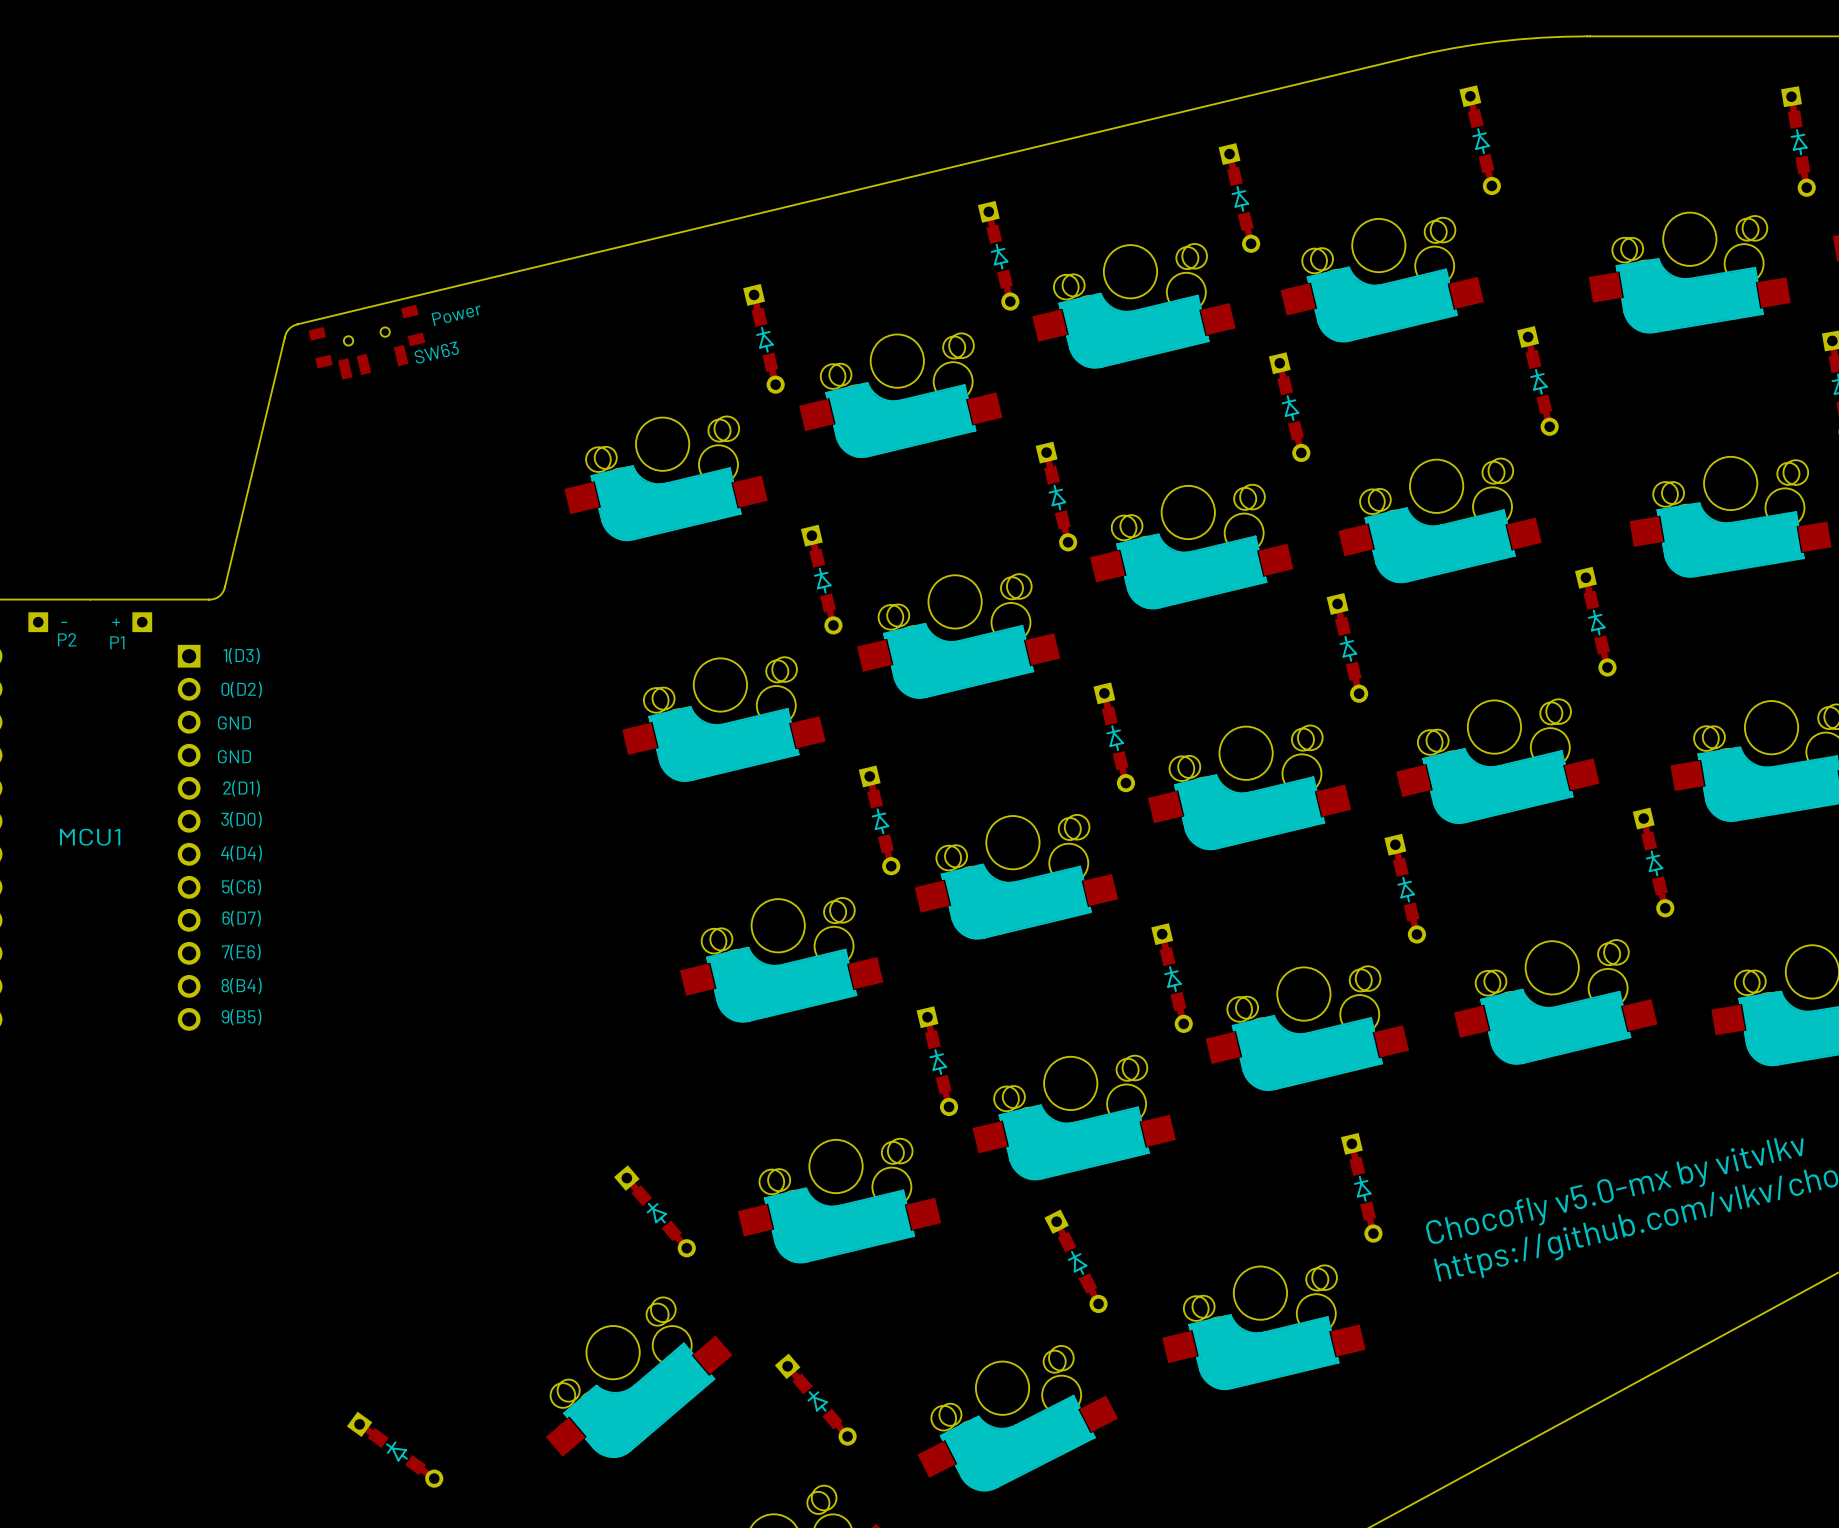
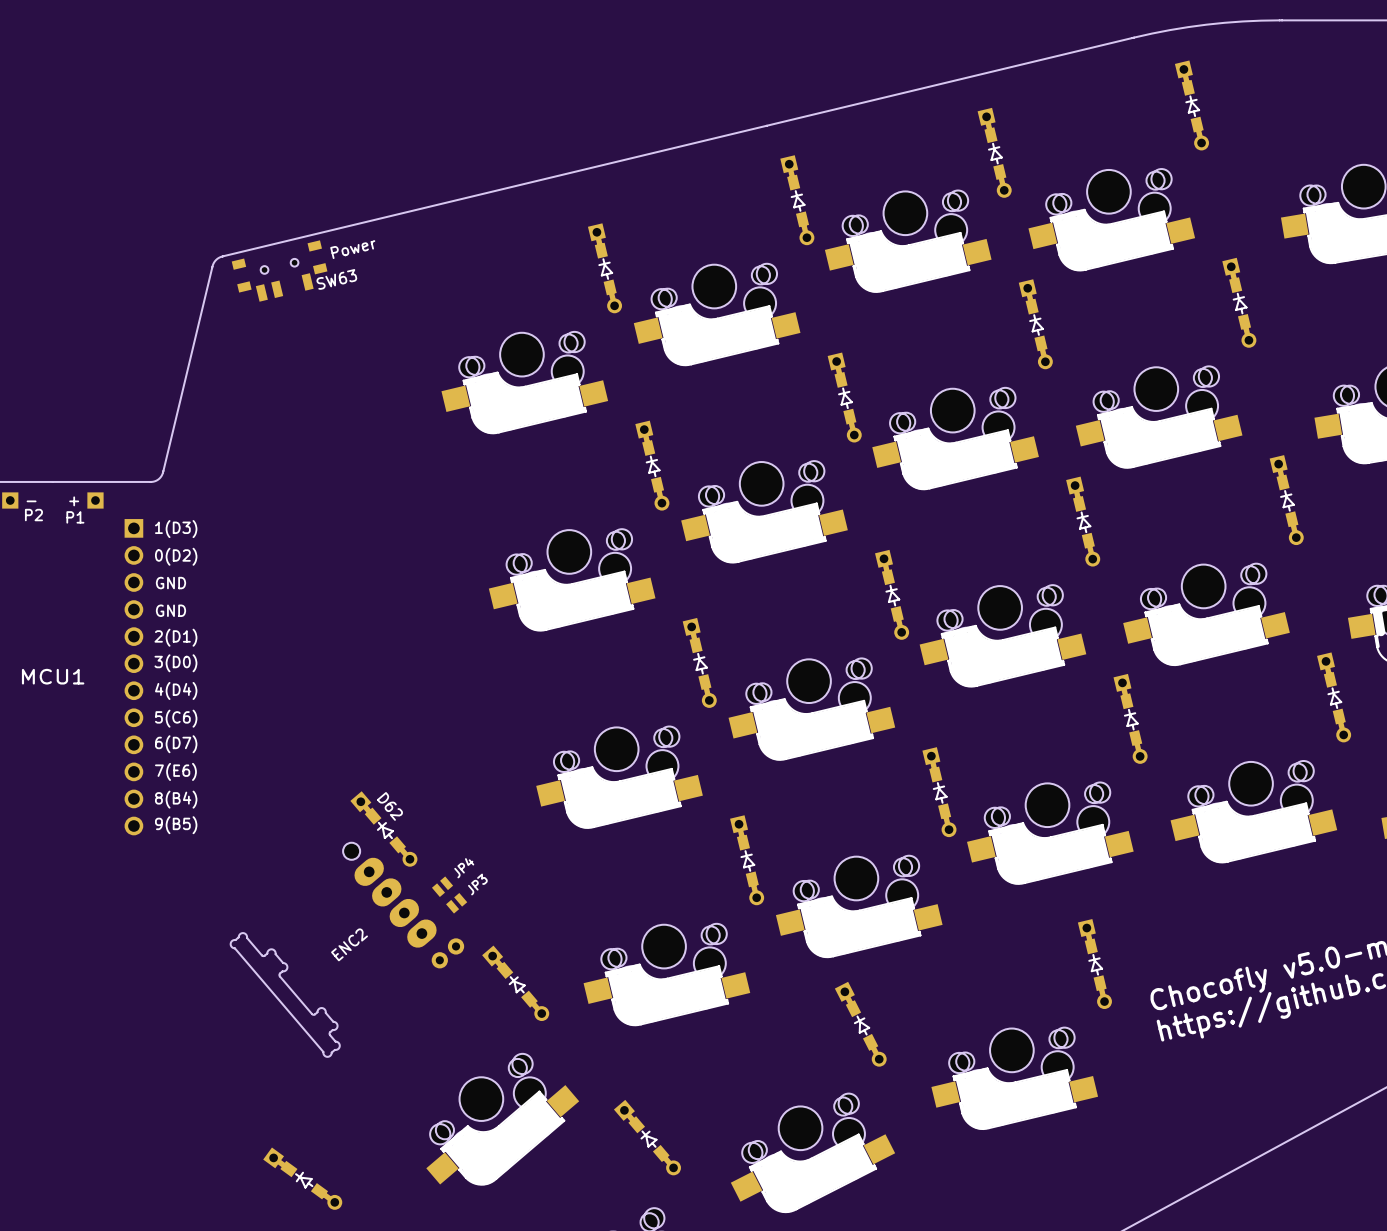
D62: none -> (383, 828)
JP4: none -> (442, 886)
JP3: none -> (456, 903)
ENC2: none -> (347, 949)

